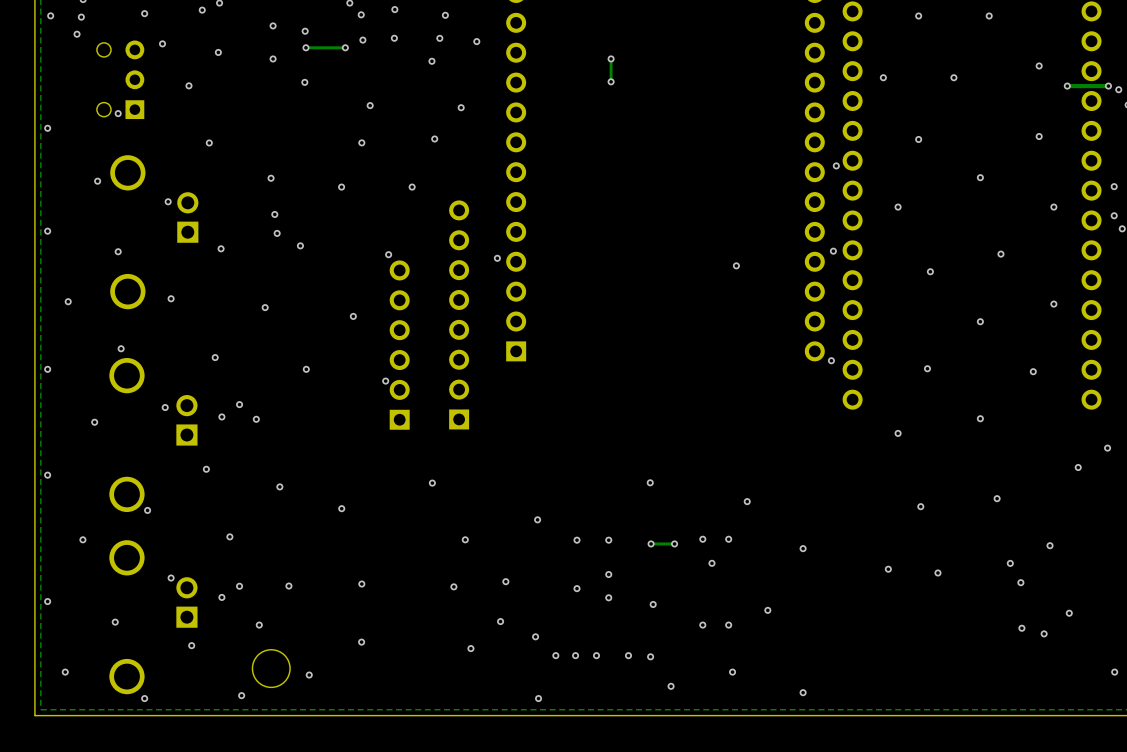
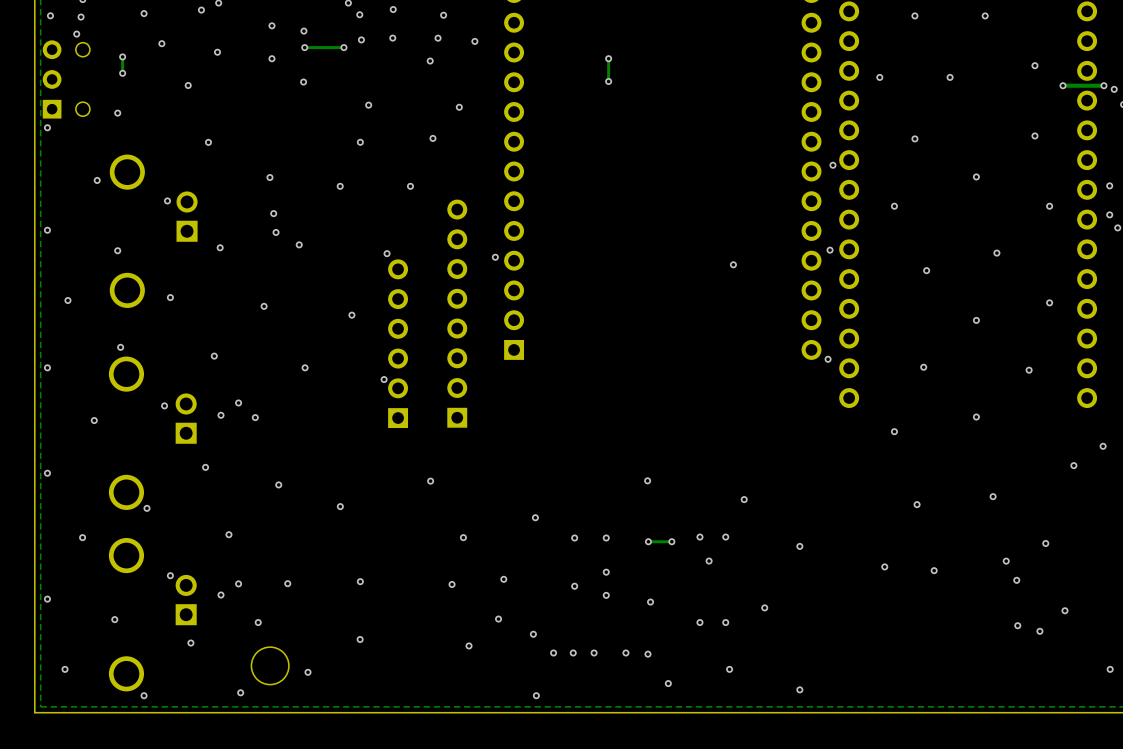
track: none -> (122, 56) (122, 73)
via: none -> (122, 56)
via: none -> (122, 73)
part: none -> (66, 79)
part: (120, 79) -> none

